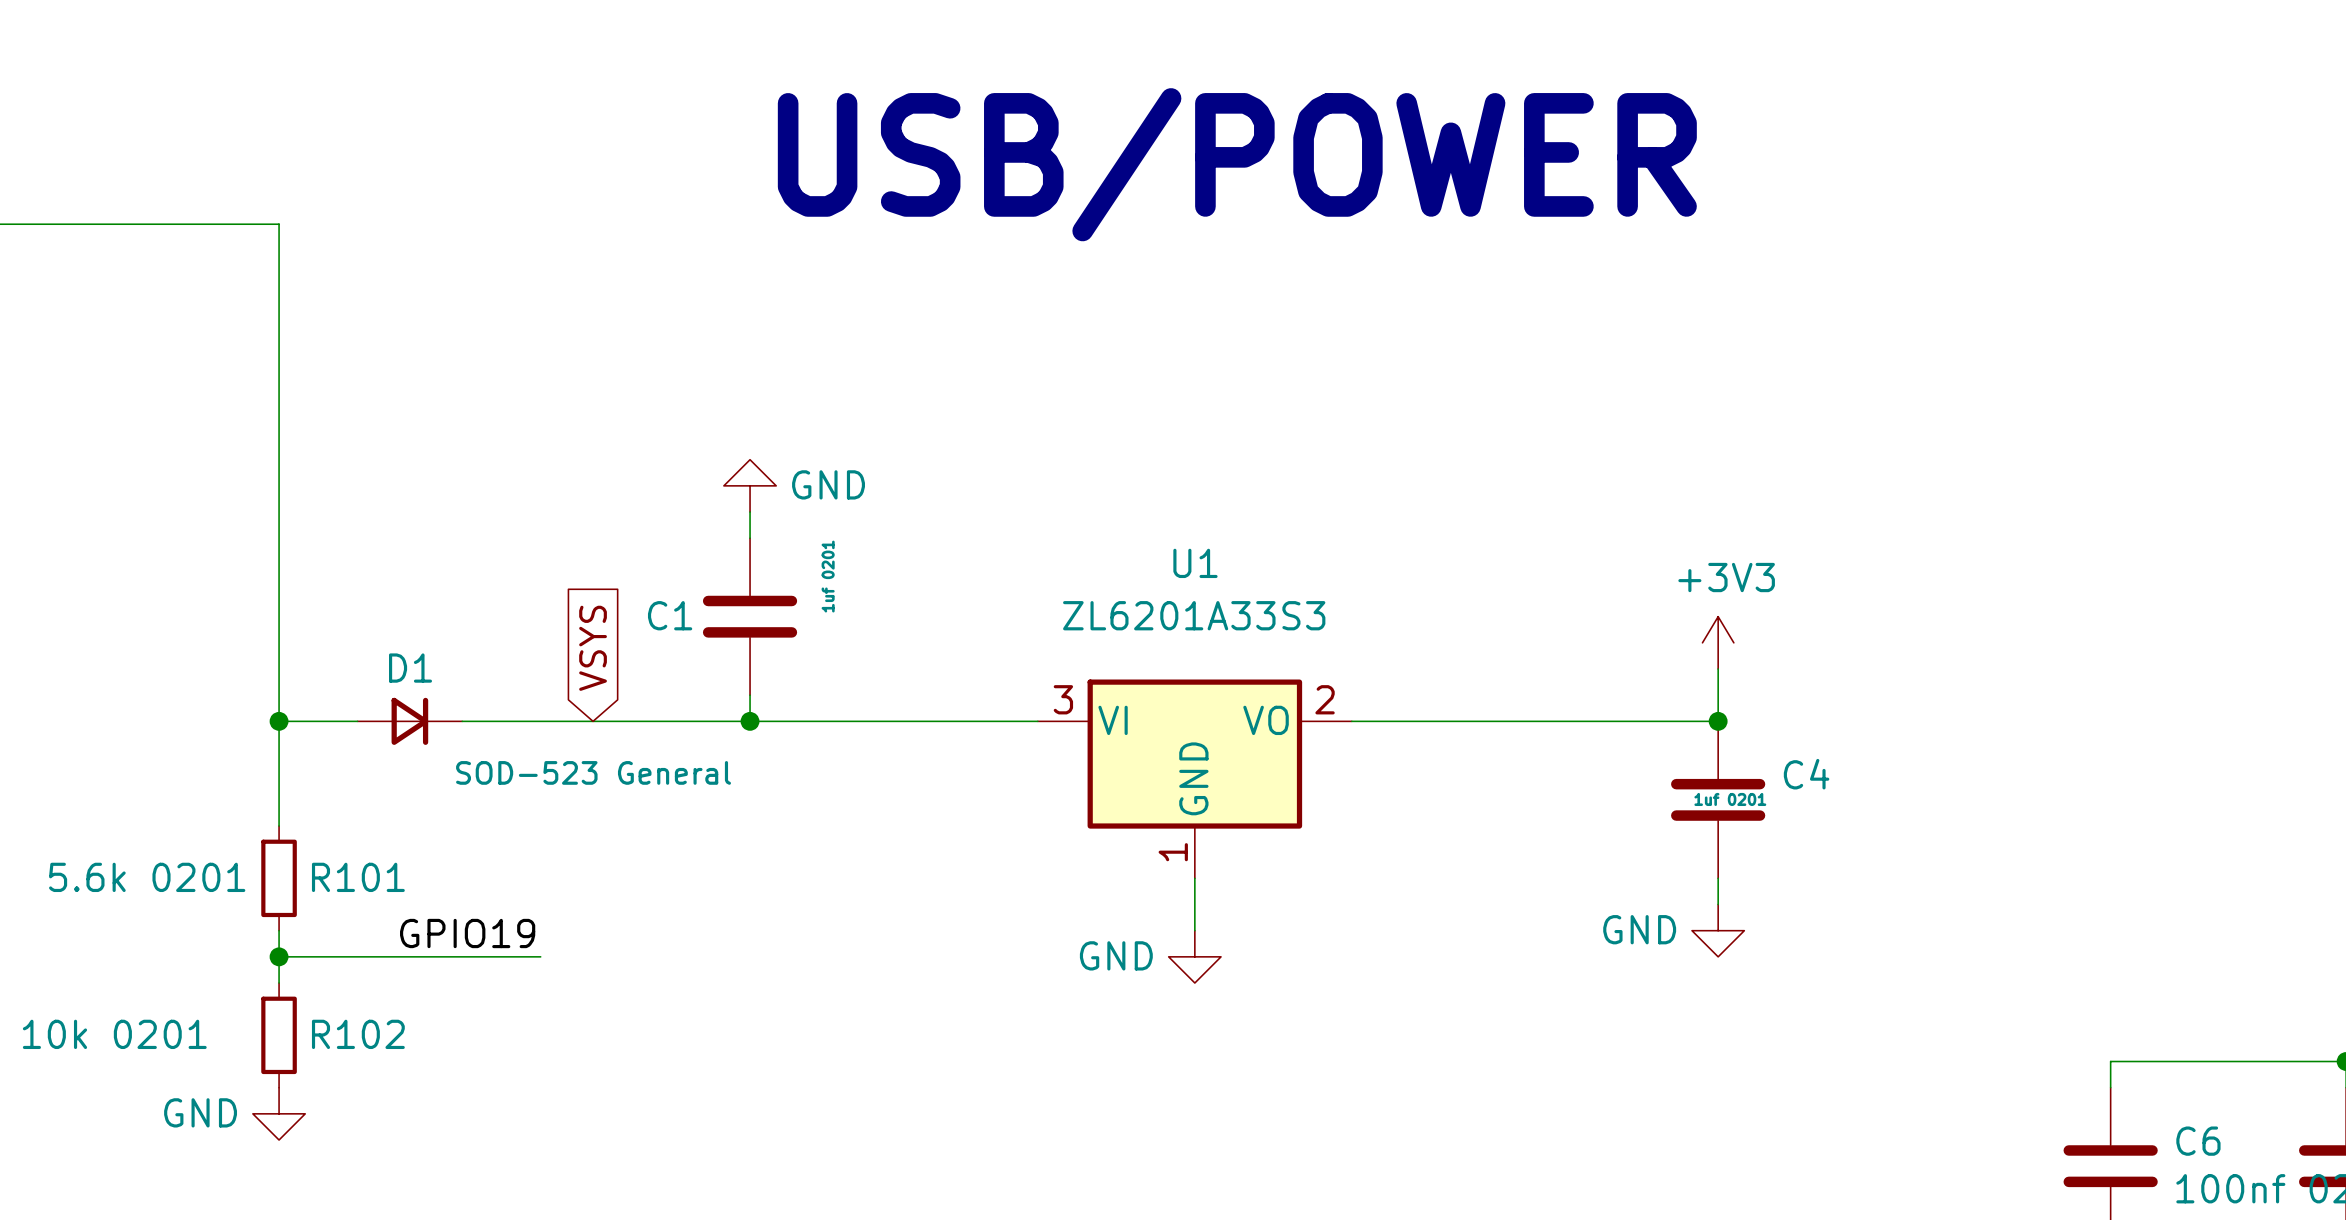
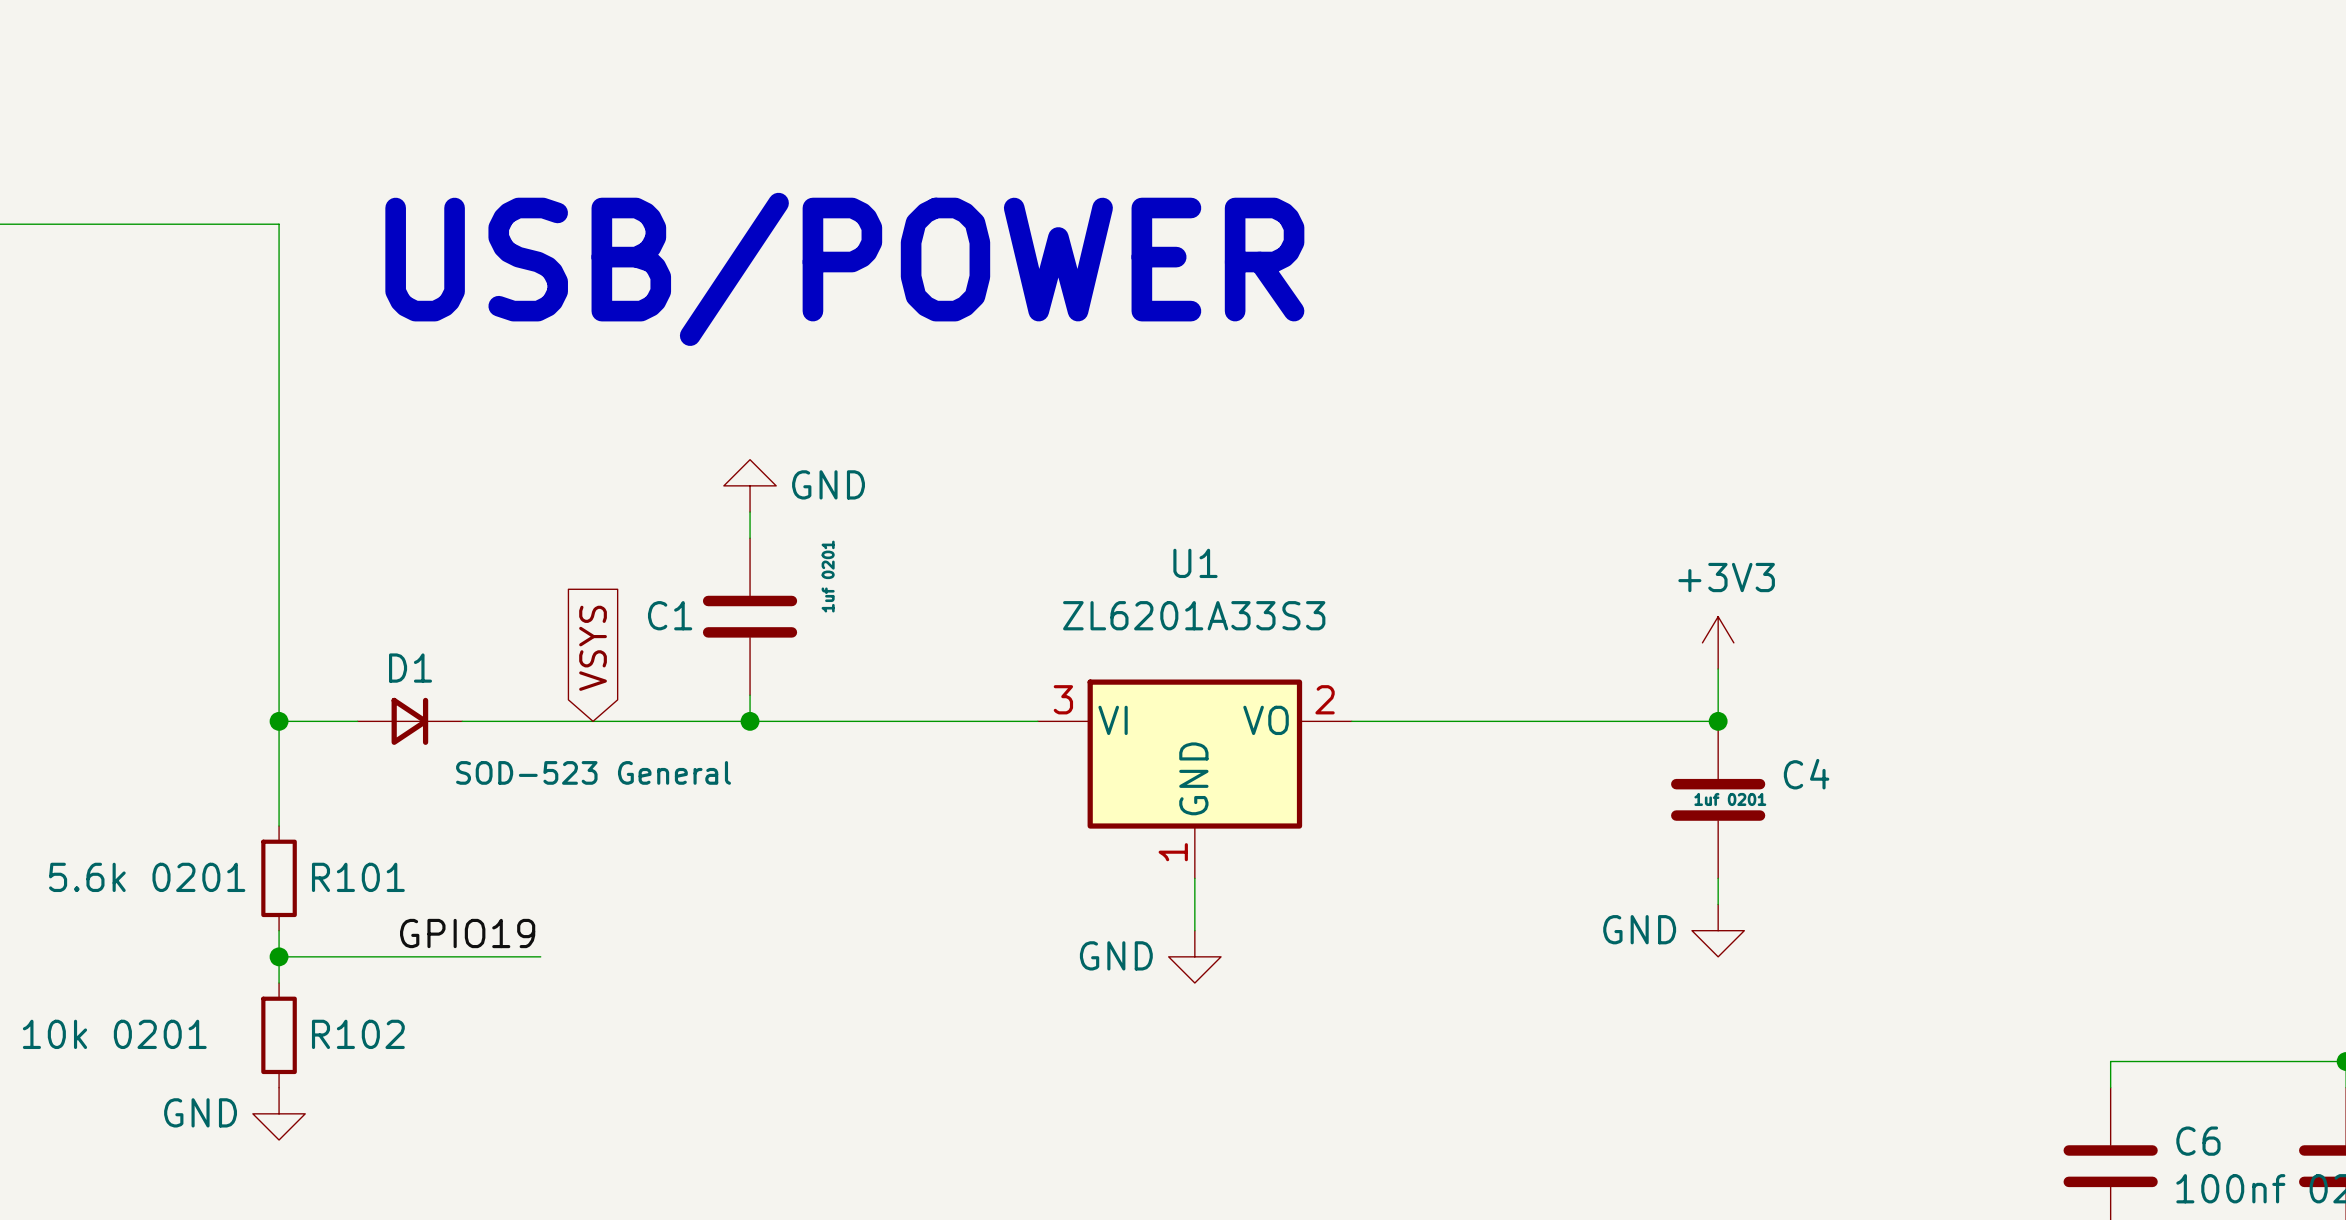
text position: USB/POWER (1237, 164) -> USB/POWER (844, 269)

